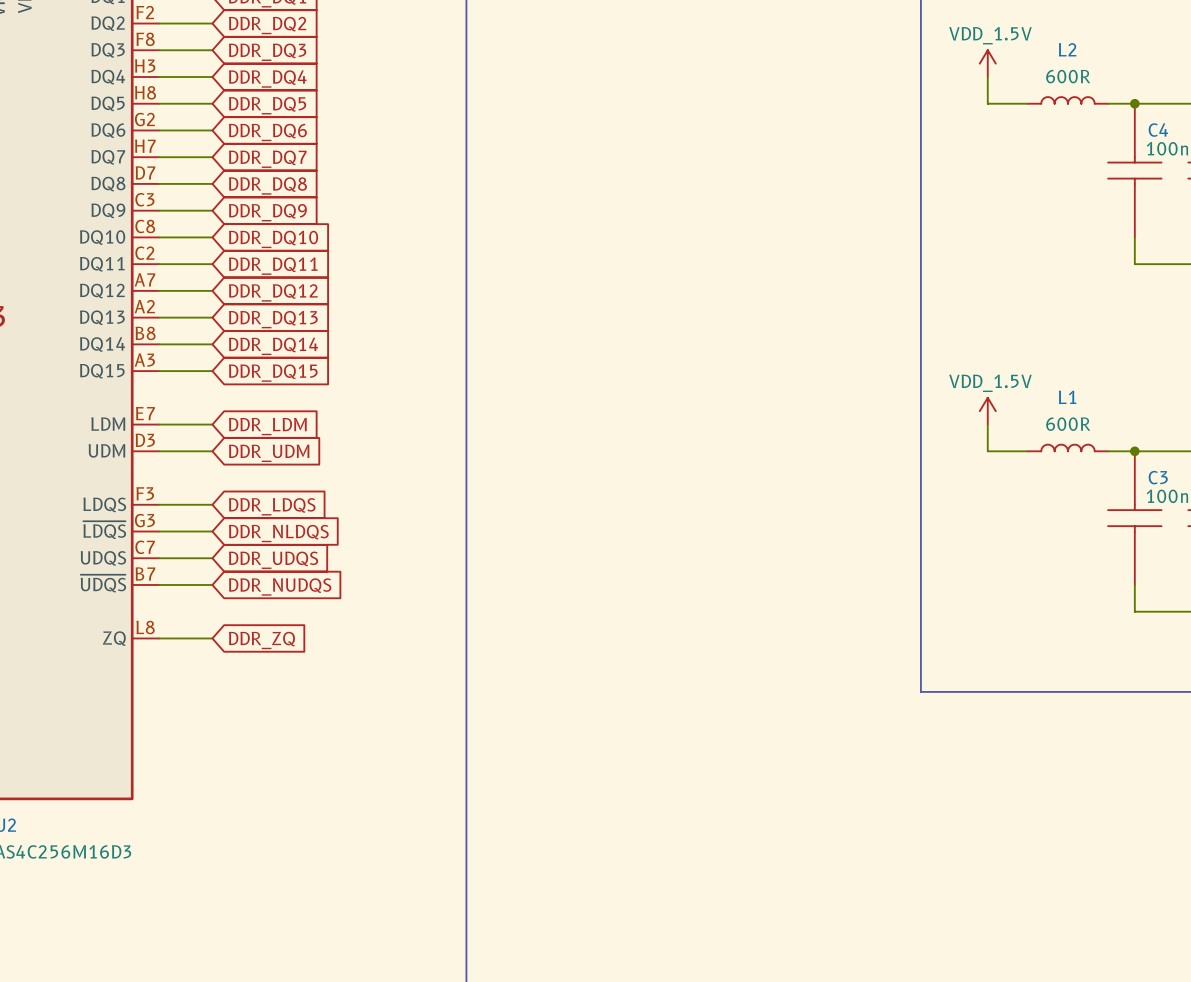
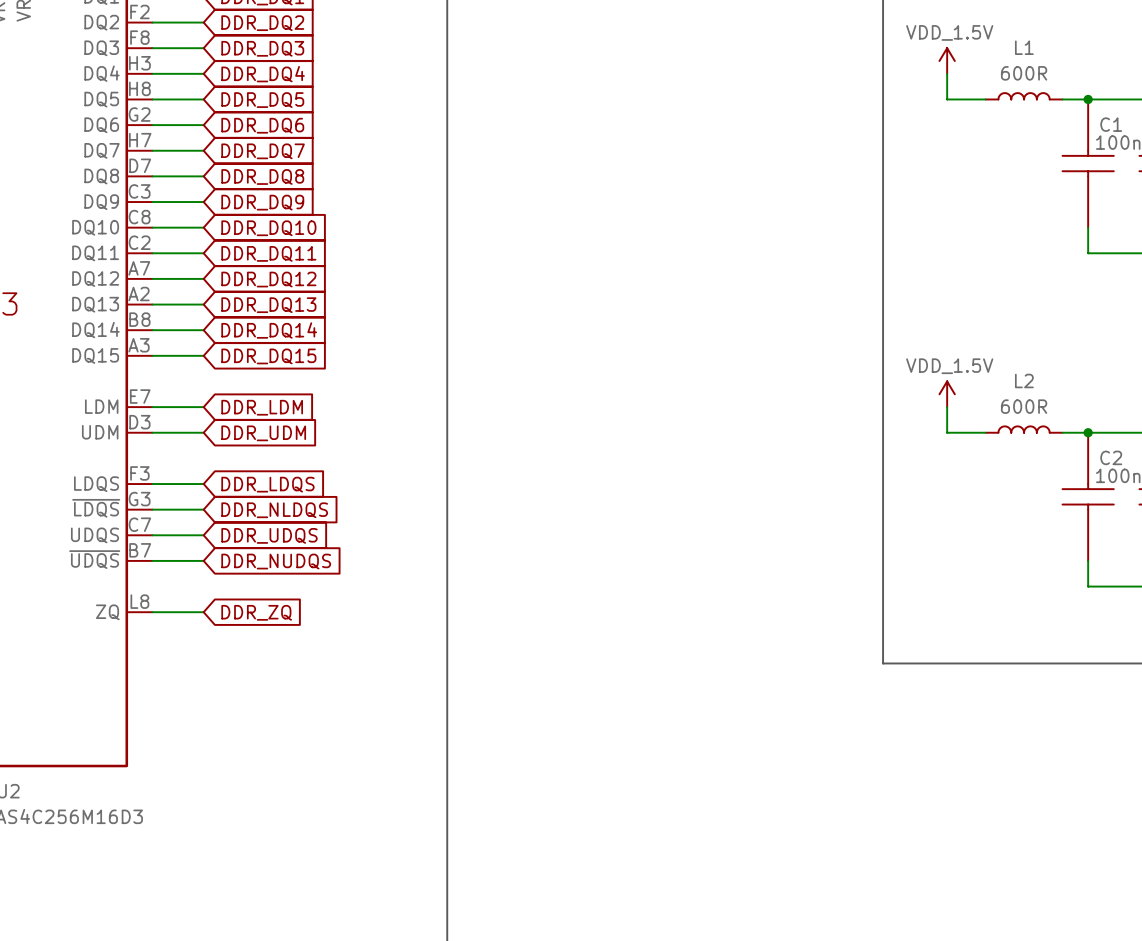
L2 name: L2 (1067, 49) -> L1 (1024, 47)
C4 name: C4 (1158, 130) -> C1 (1111, 124)
L1 name: L1 (1067, 397) -> L2 (1024, 380)
C3 name: C3 (1158, 477) -> C2 (1111, 457)

